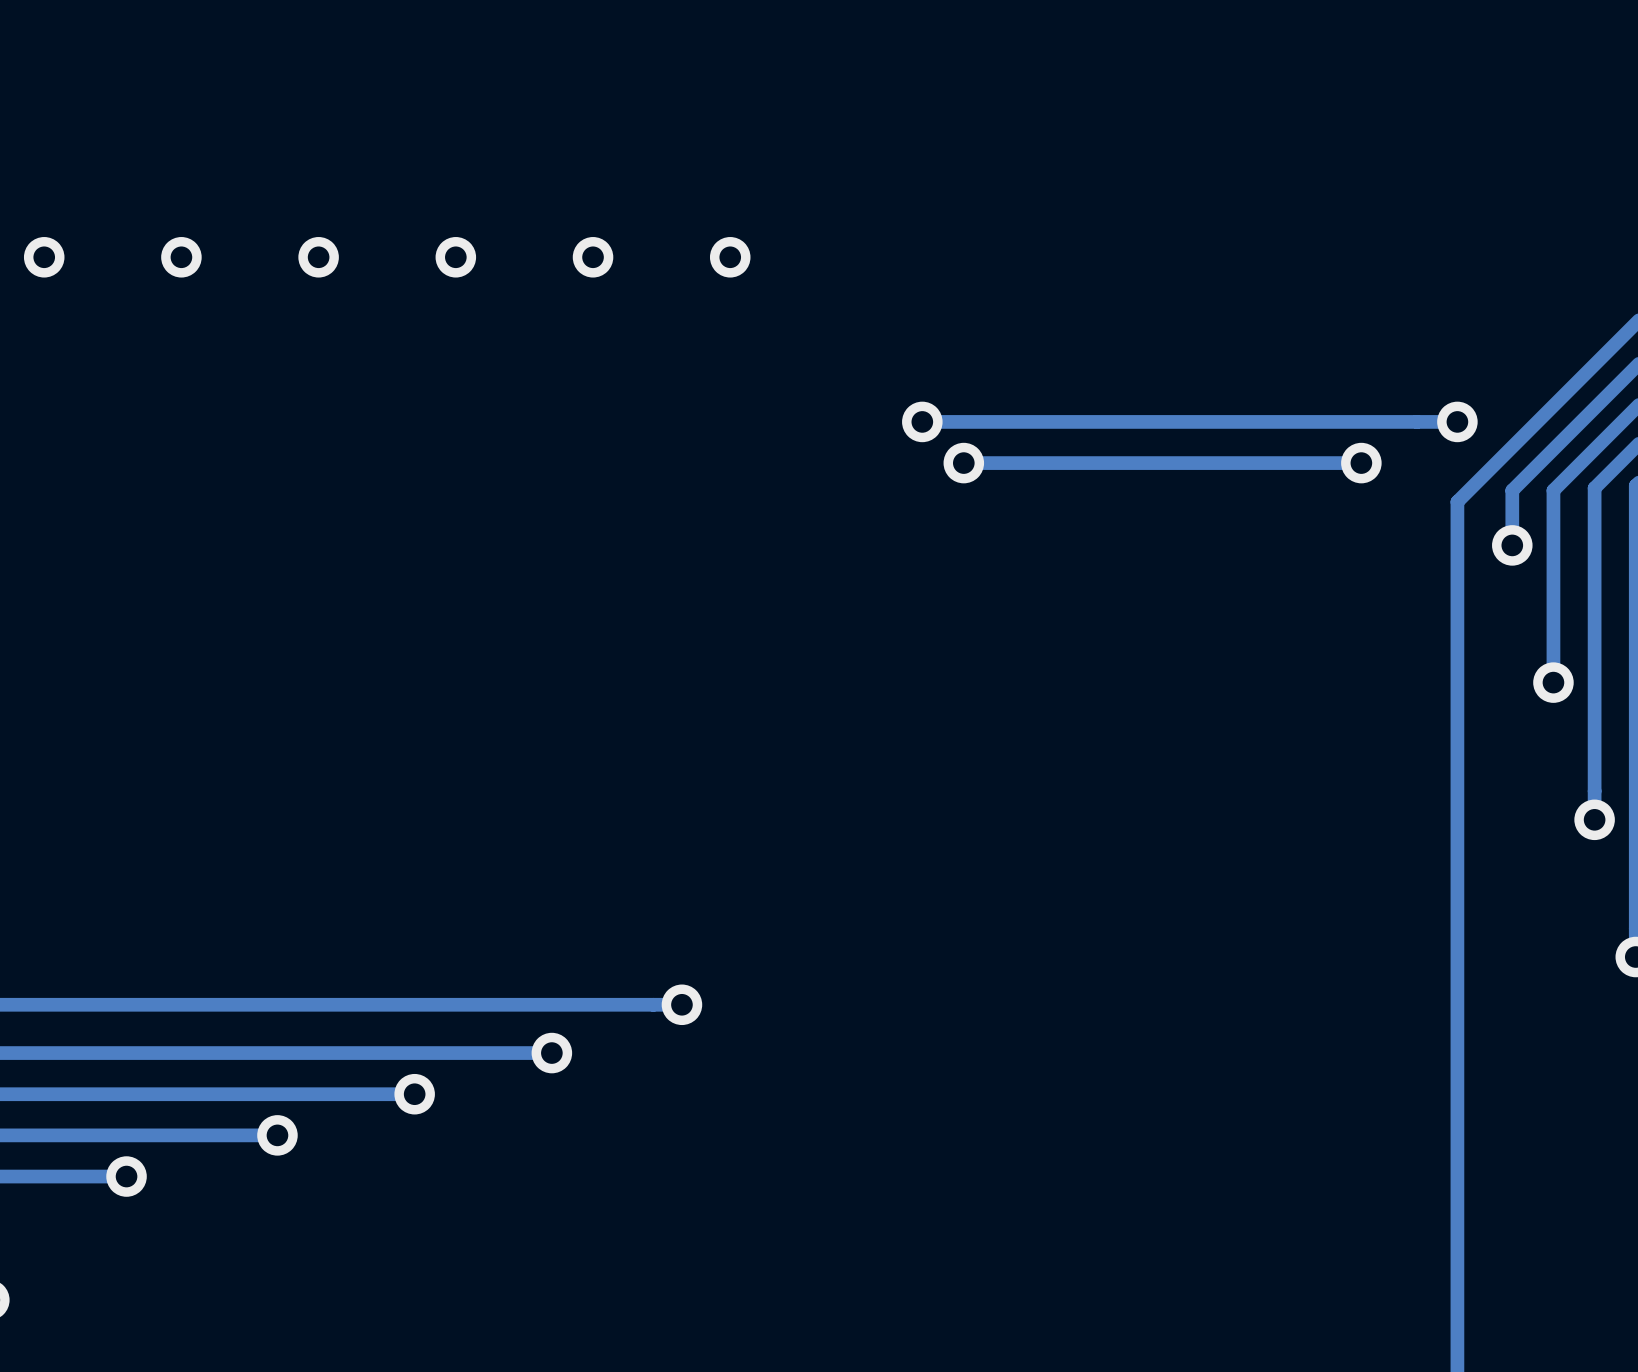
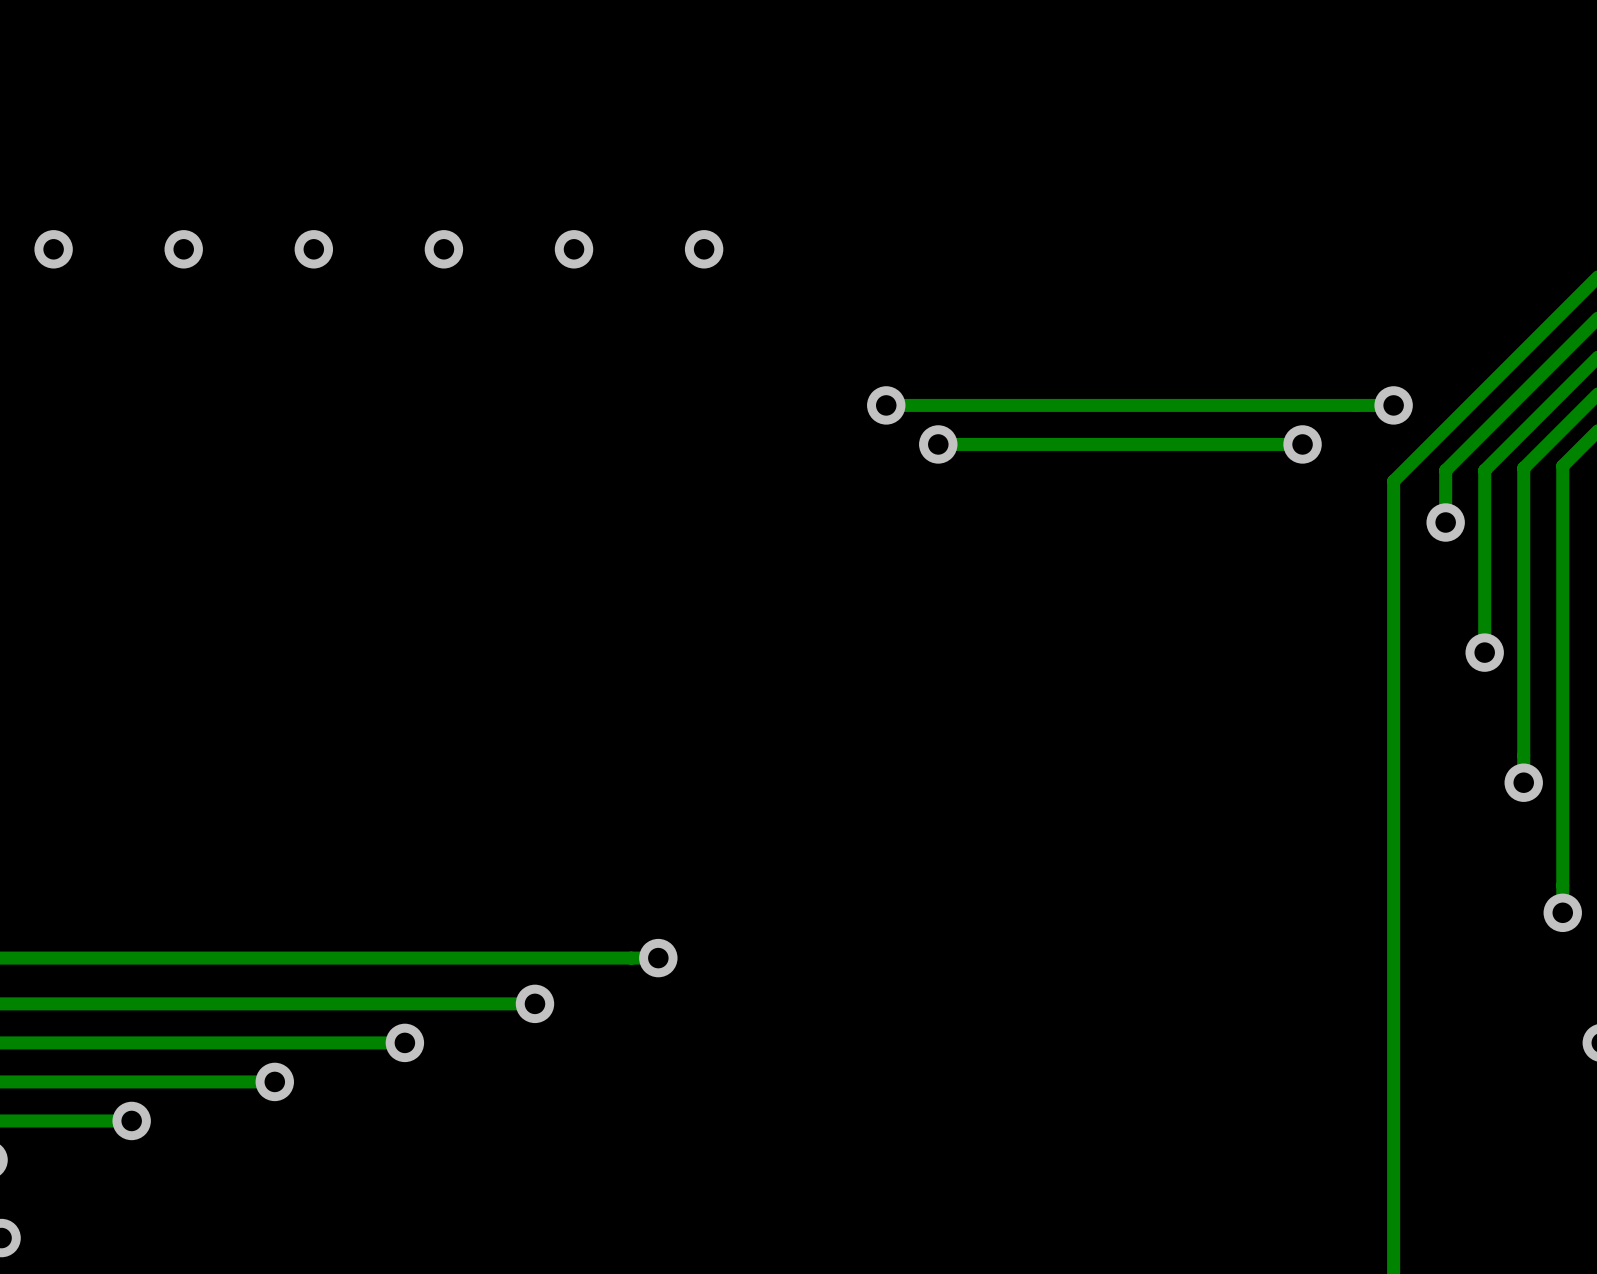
via position: (963, 463) -> (938, 444)

